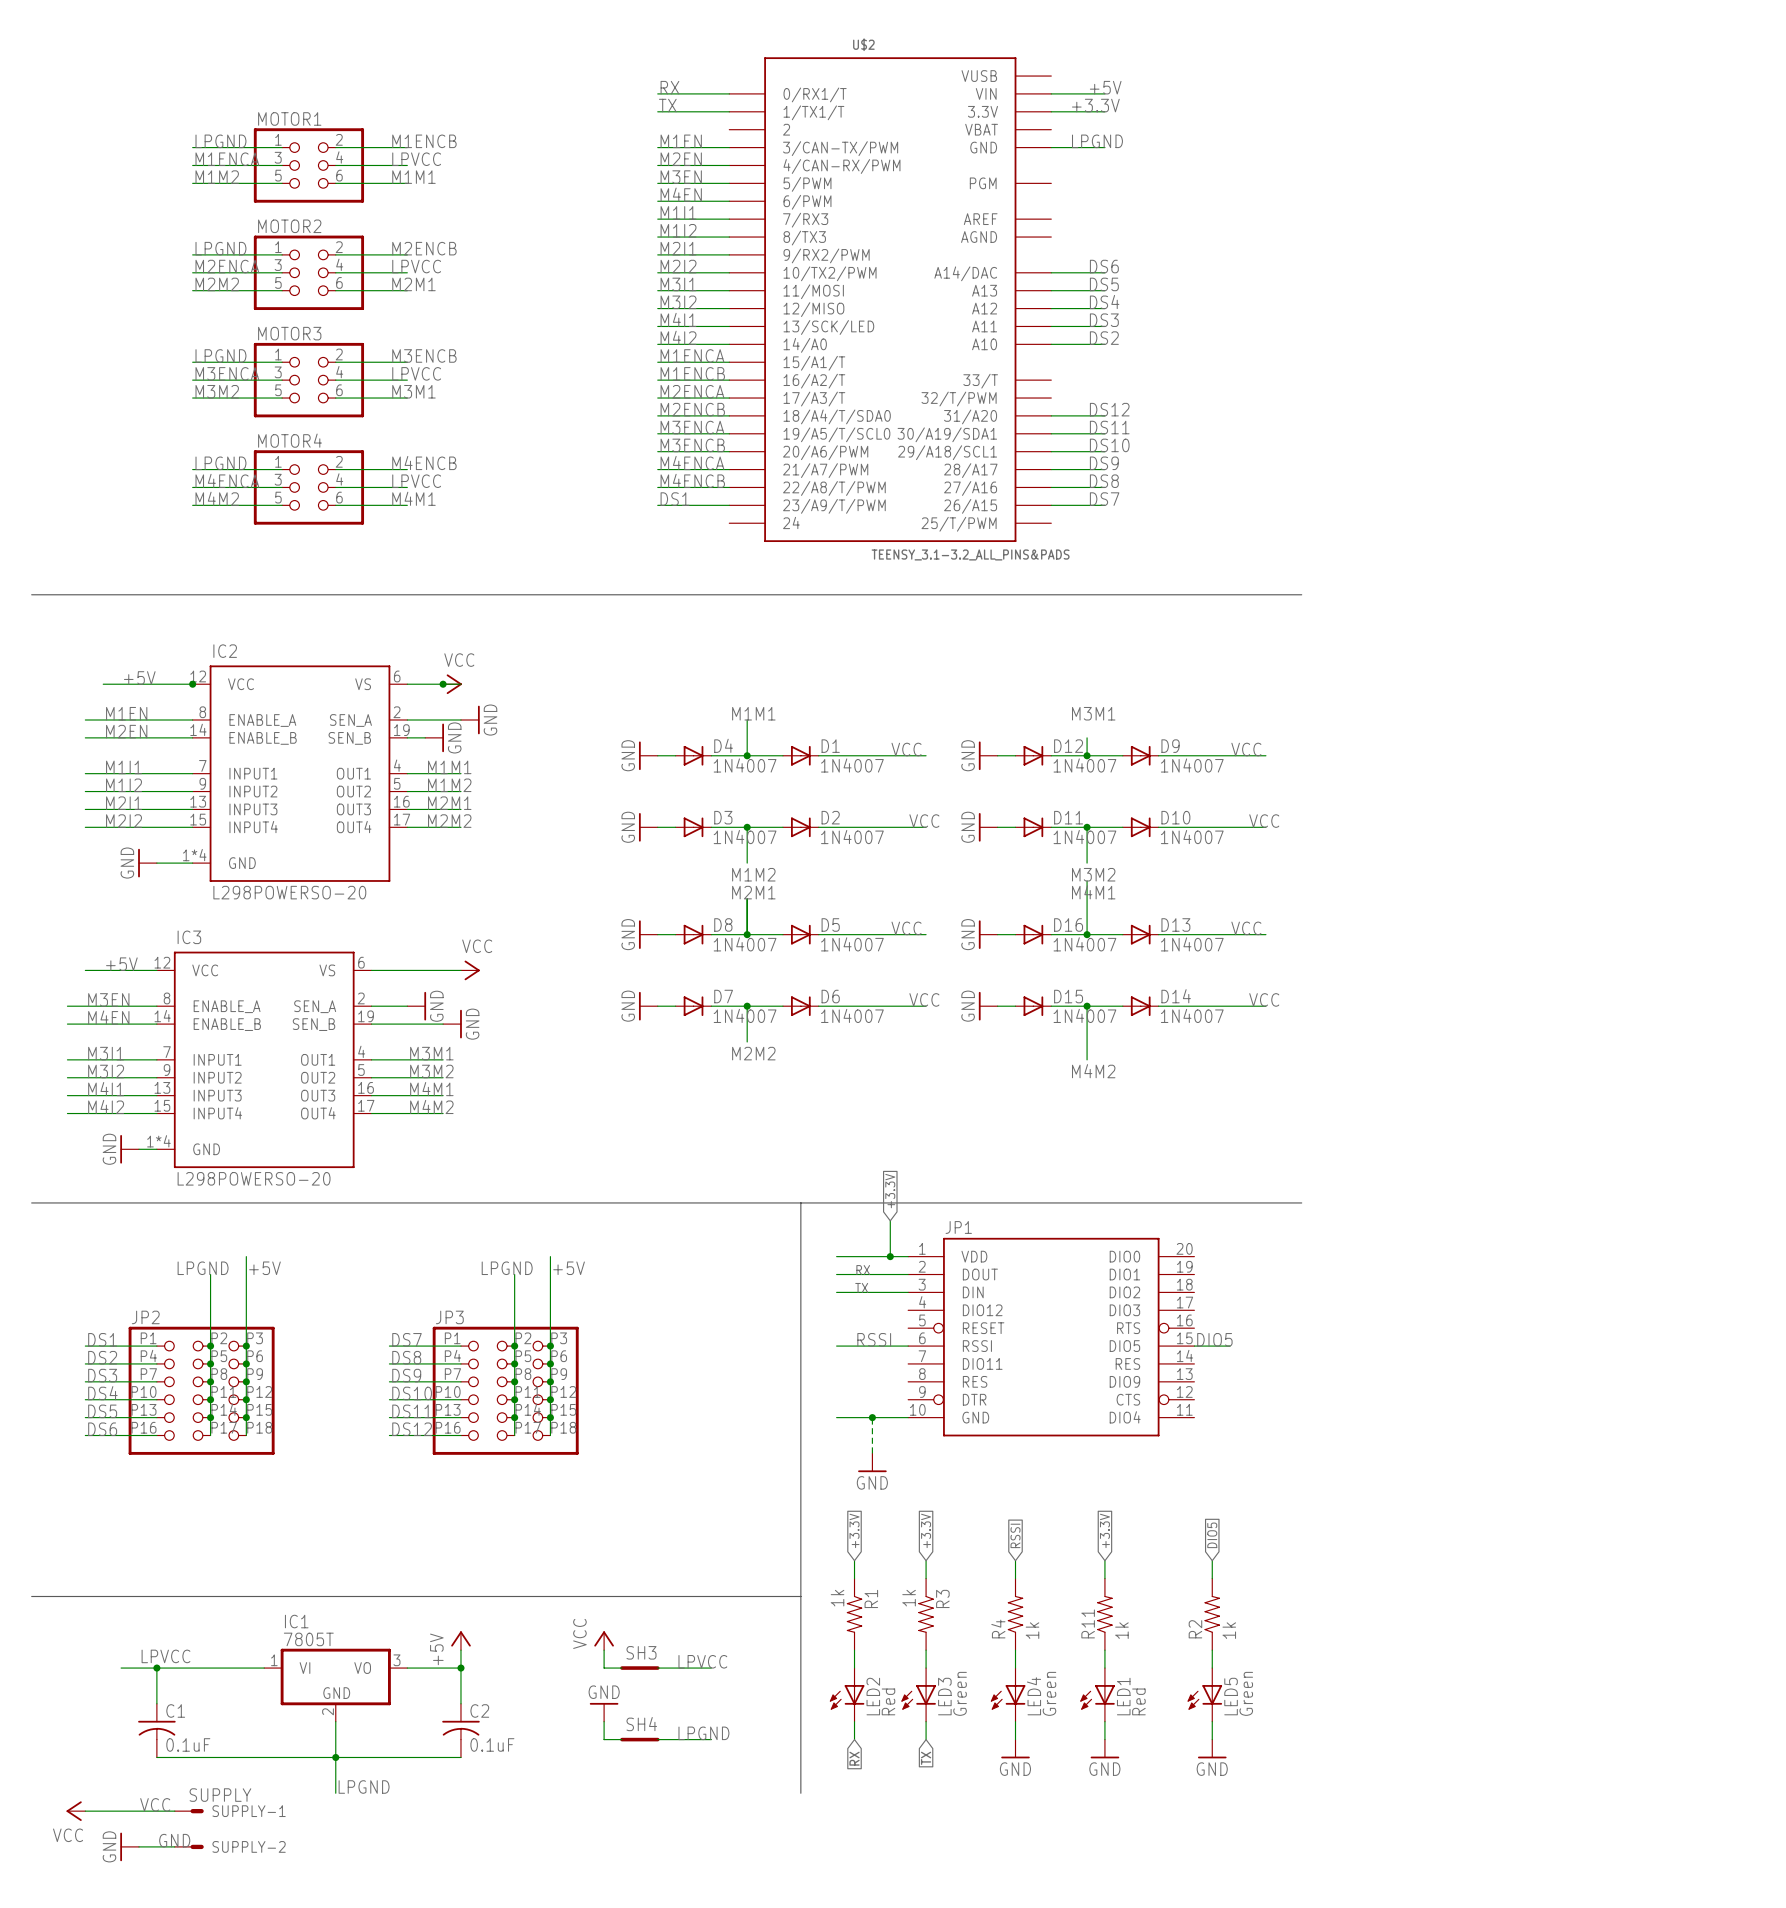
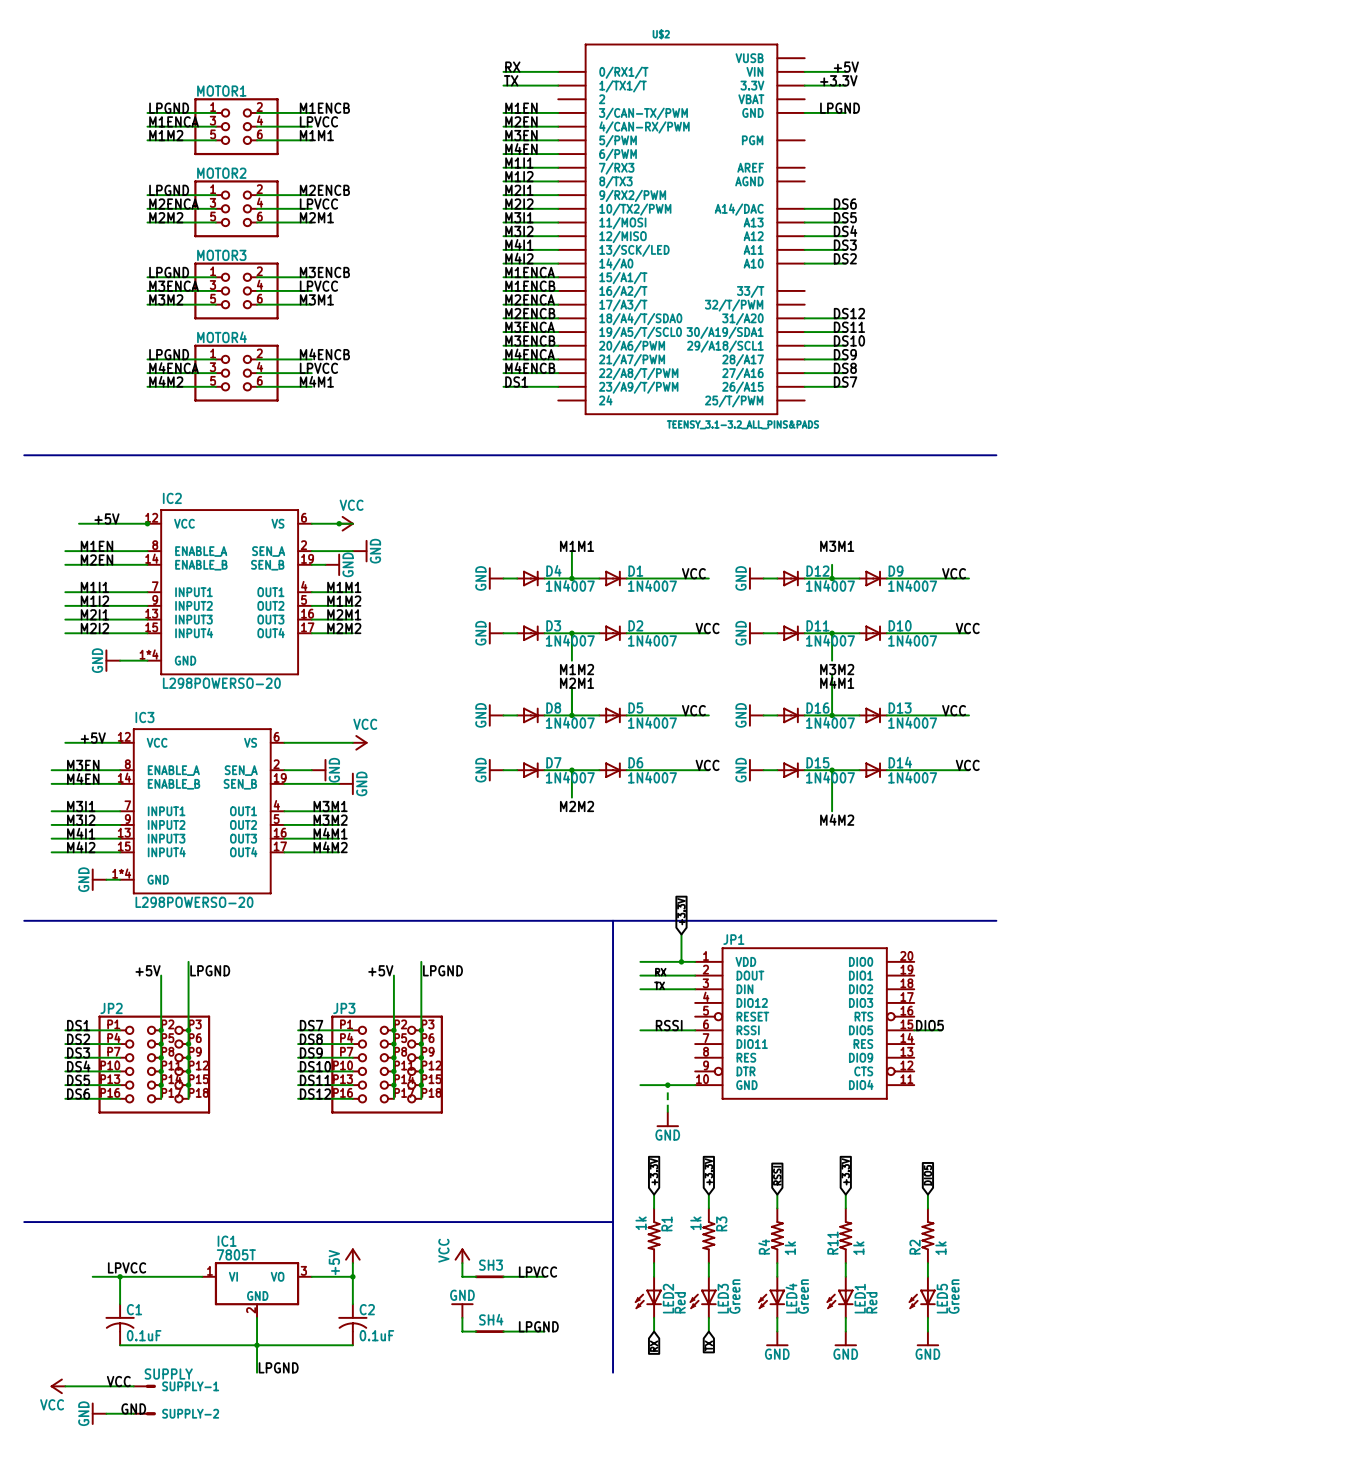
label: LPGND (203, 1268) -> +5V (148, 970)
label: +5V (264, 1268) -> LPGND (210, 970)
label: LPGND (507, 1268) -> +5V (380, 970)
label: +5V (569, 1268) -> LPGND (442, 970)

